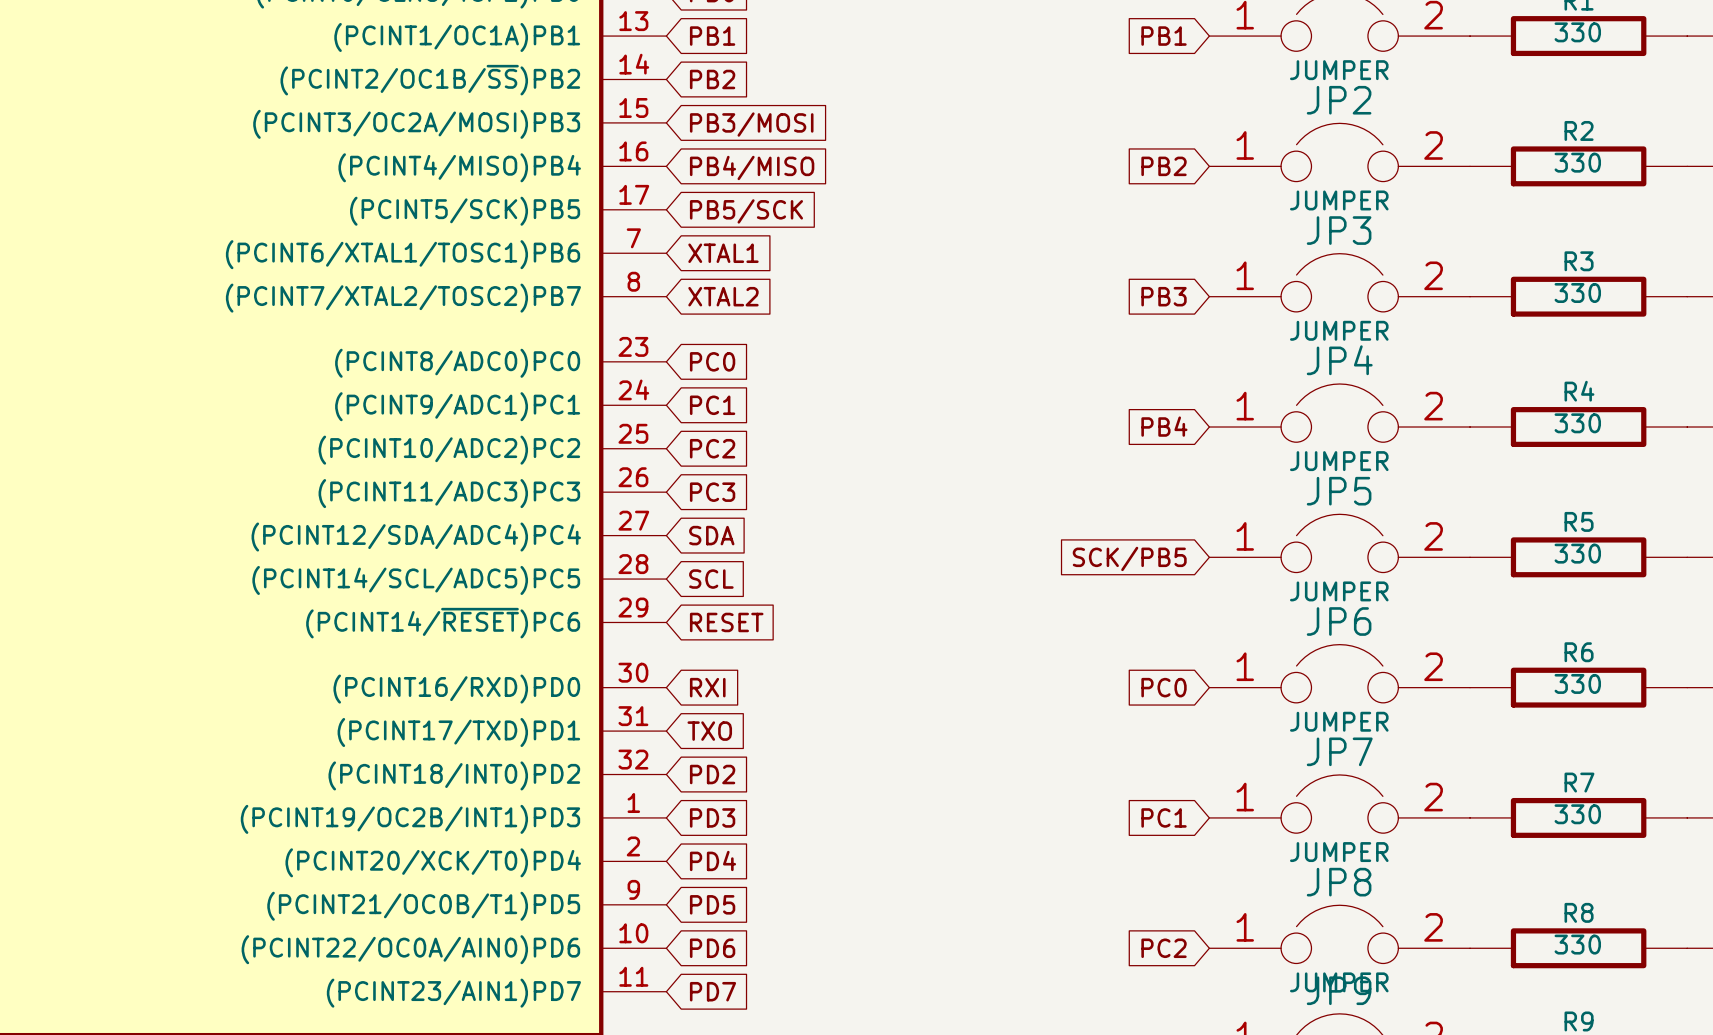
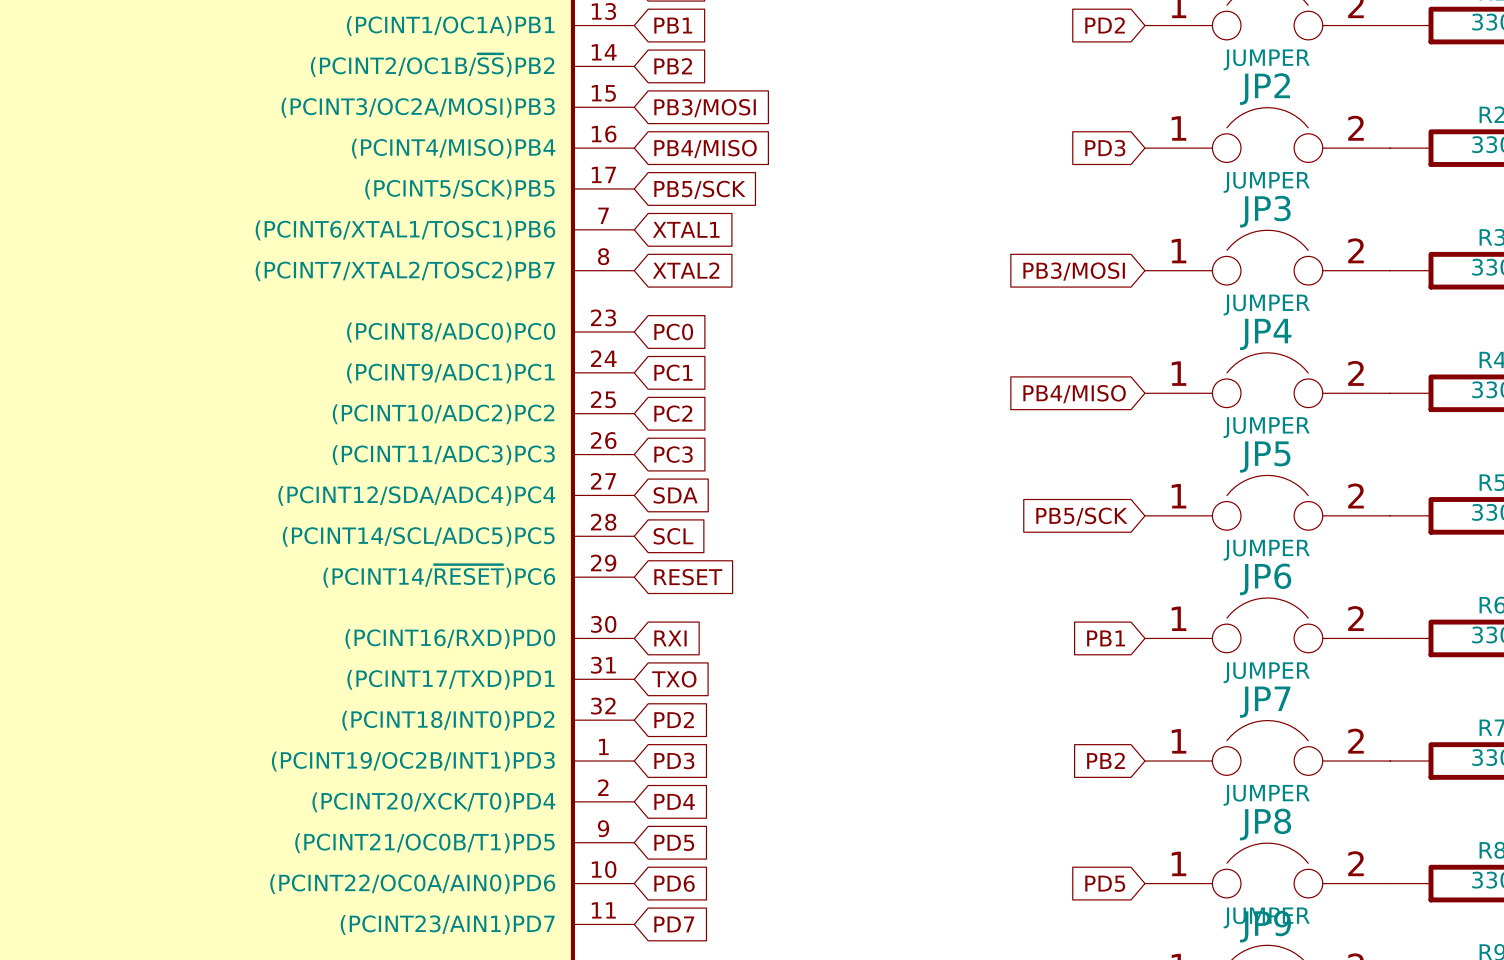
global label: PB1 (1164, 36) -> PD2 (1105, 25)
global label: PB2 (1164, 166) -> PD3 (1105, 148)
global label: PB3 (1164, 296) -> PB3/MOSI (1074, 271)
global label: PB4 (1164, 426) -> PB4/MISO (1074, 394)
global label: SCK/PB5 (1129, 558) -> PB5/SCK (1081, 516)
global label: PC0 (1164, 687) -> PB1 (1106, 638)
global label: PC1 (1164, 817) -> PB2 (1106, 760)
global label: PC2 (1164, 948) -> PD5 (1105, 883)

